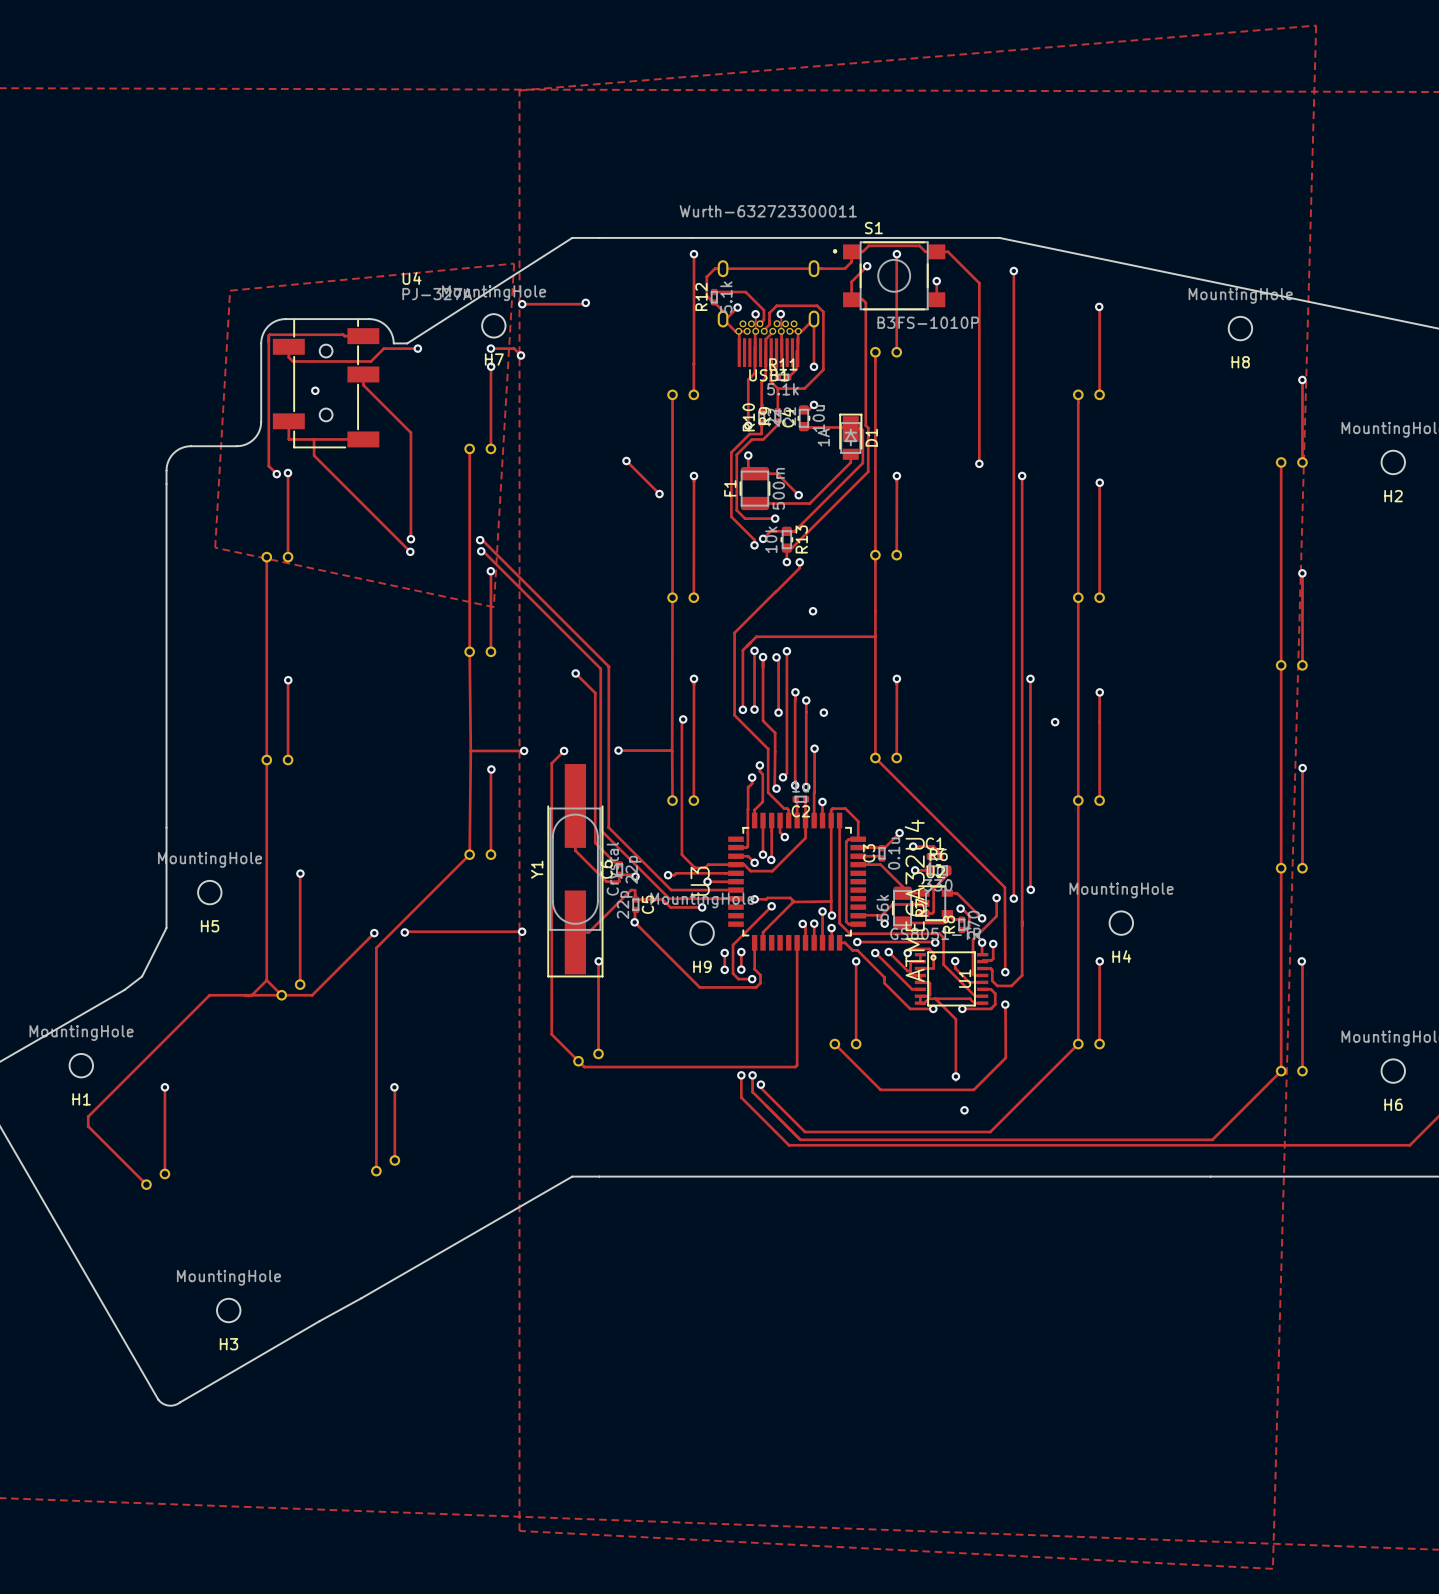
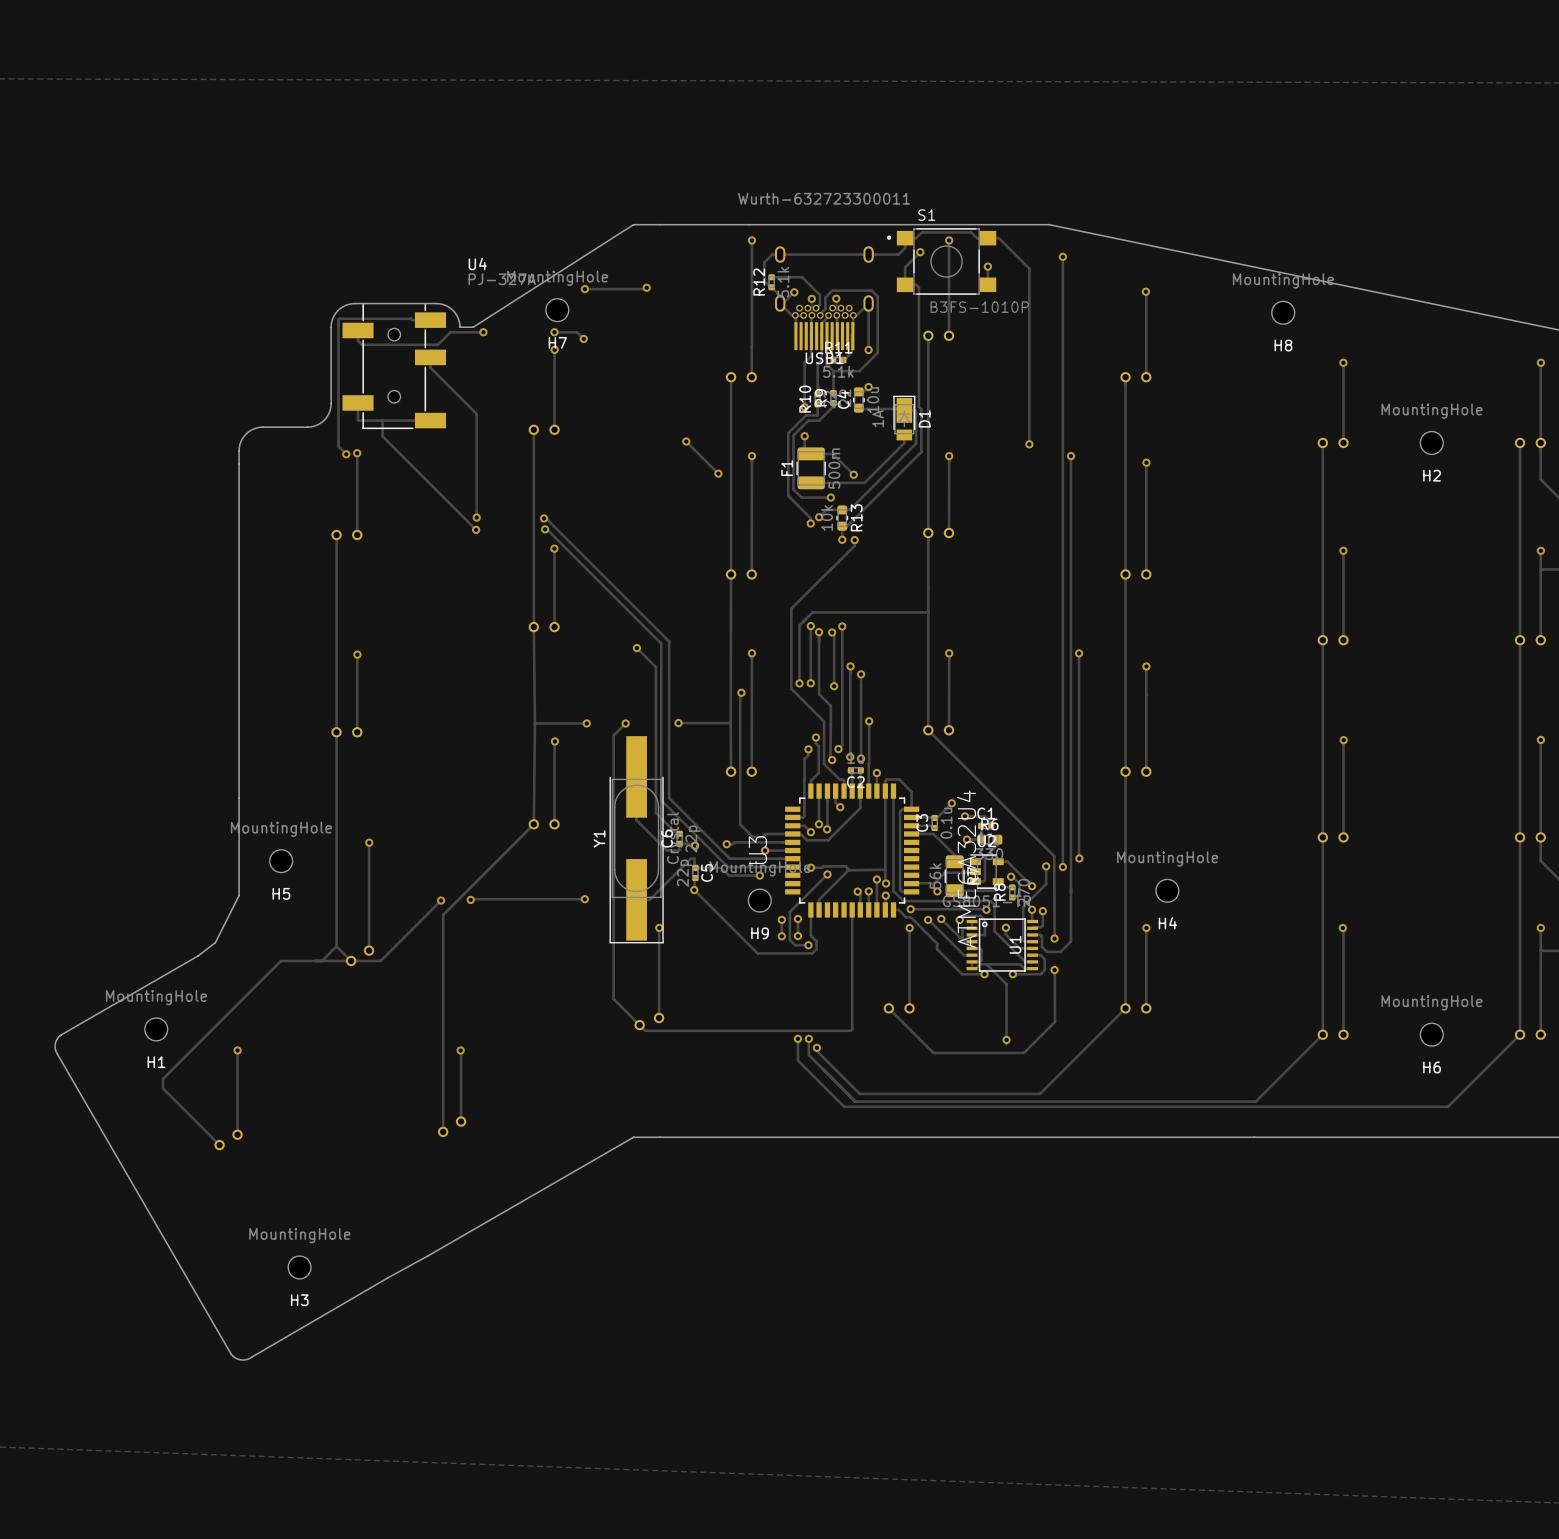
zone outline: (1316, 25) (519, 90) (519, 1530) (1272, 1568) (1316, 25) -> none
zone outline: (514, 263) (230, 290) (215, 547) (493, 607) (514, 263) -> none
via: (315, 390) -> none
via: (813, 611) -> none
via: (823, 712) -> none
via: (1055, 722) -> none
via: (964, 1110) -> none

